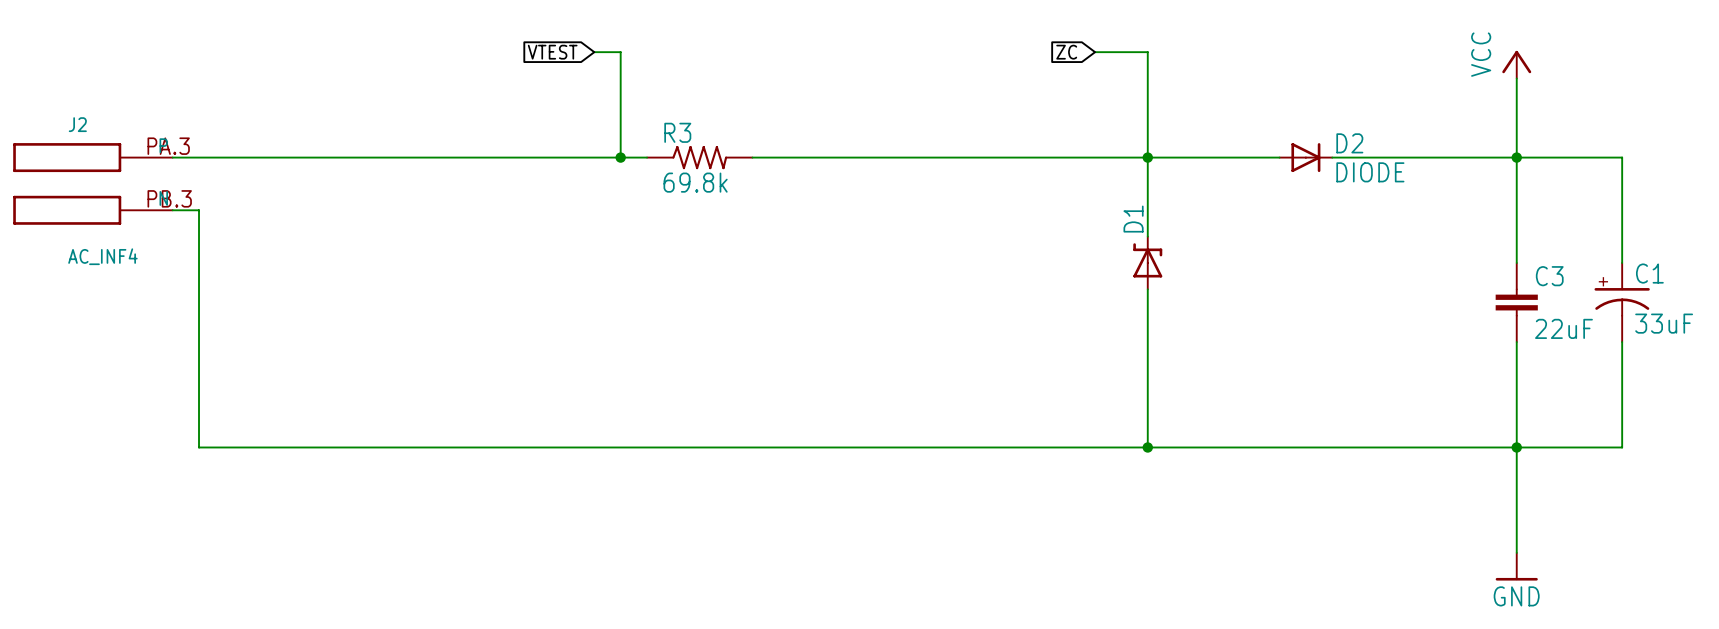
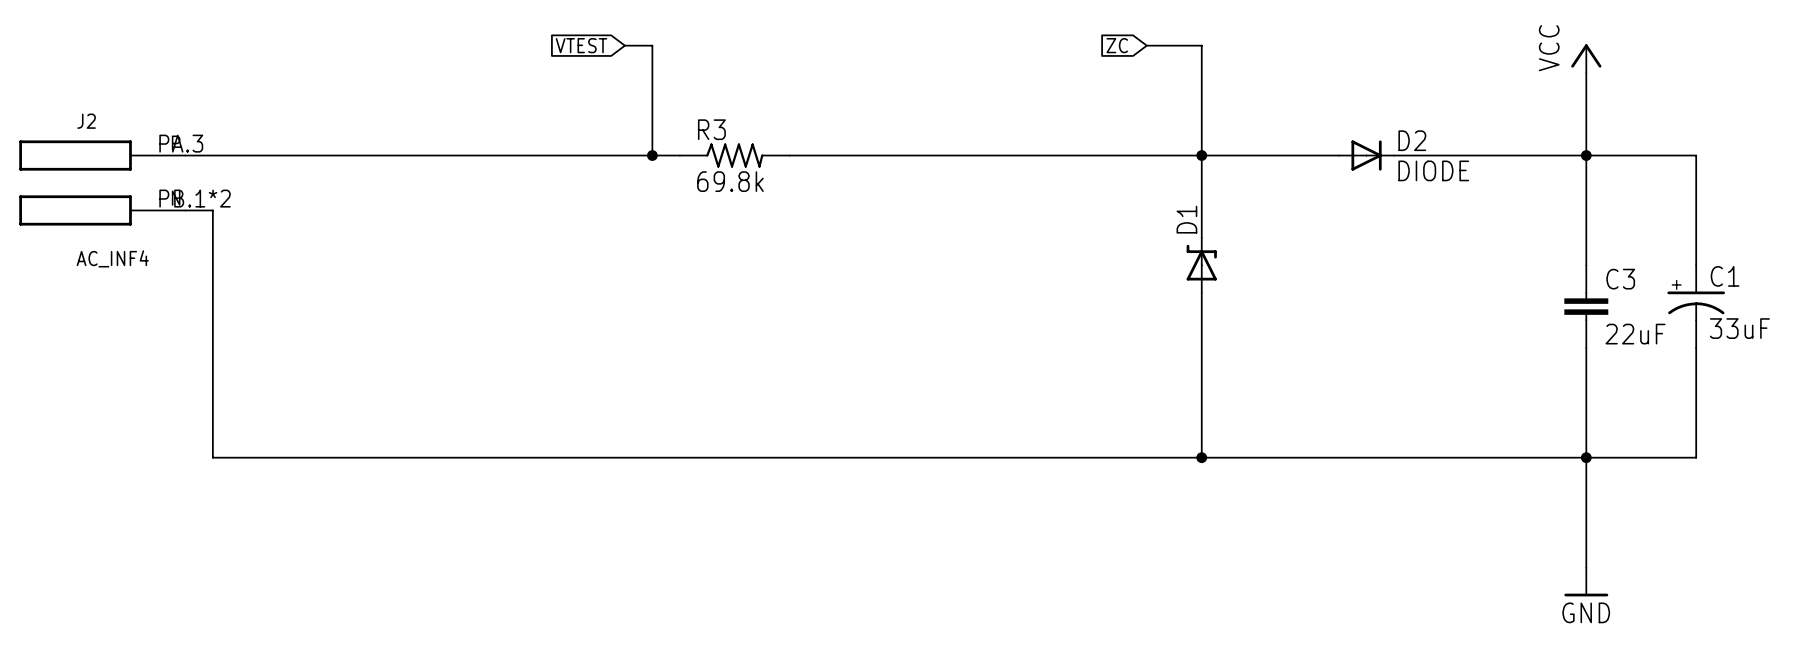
J2 pin number: PB.3 (169, 198) -> PB.1*2 (195, 198)

